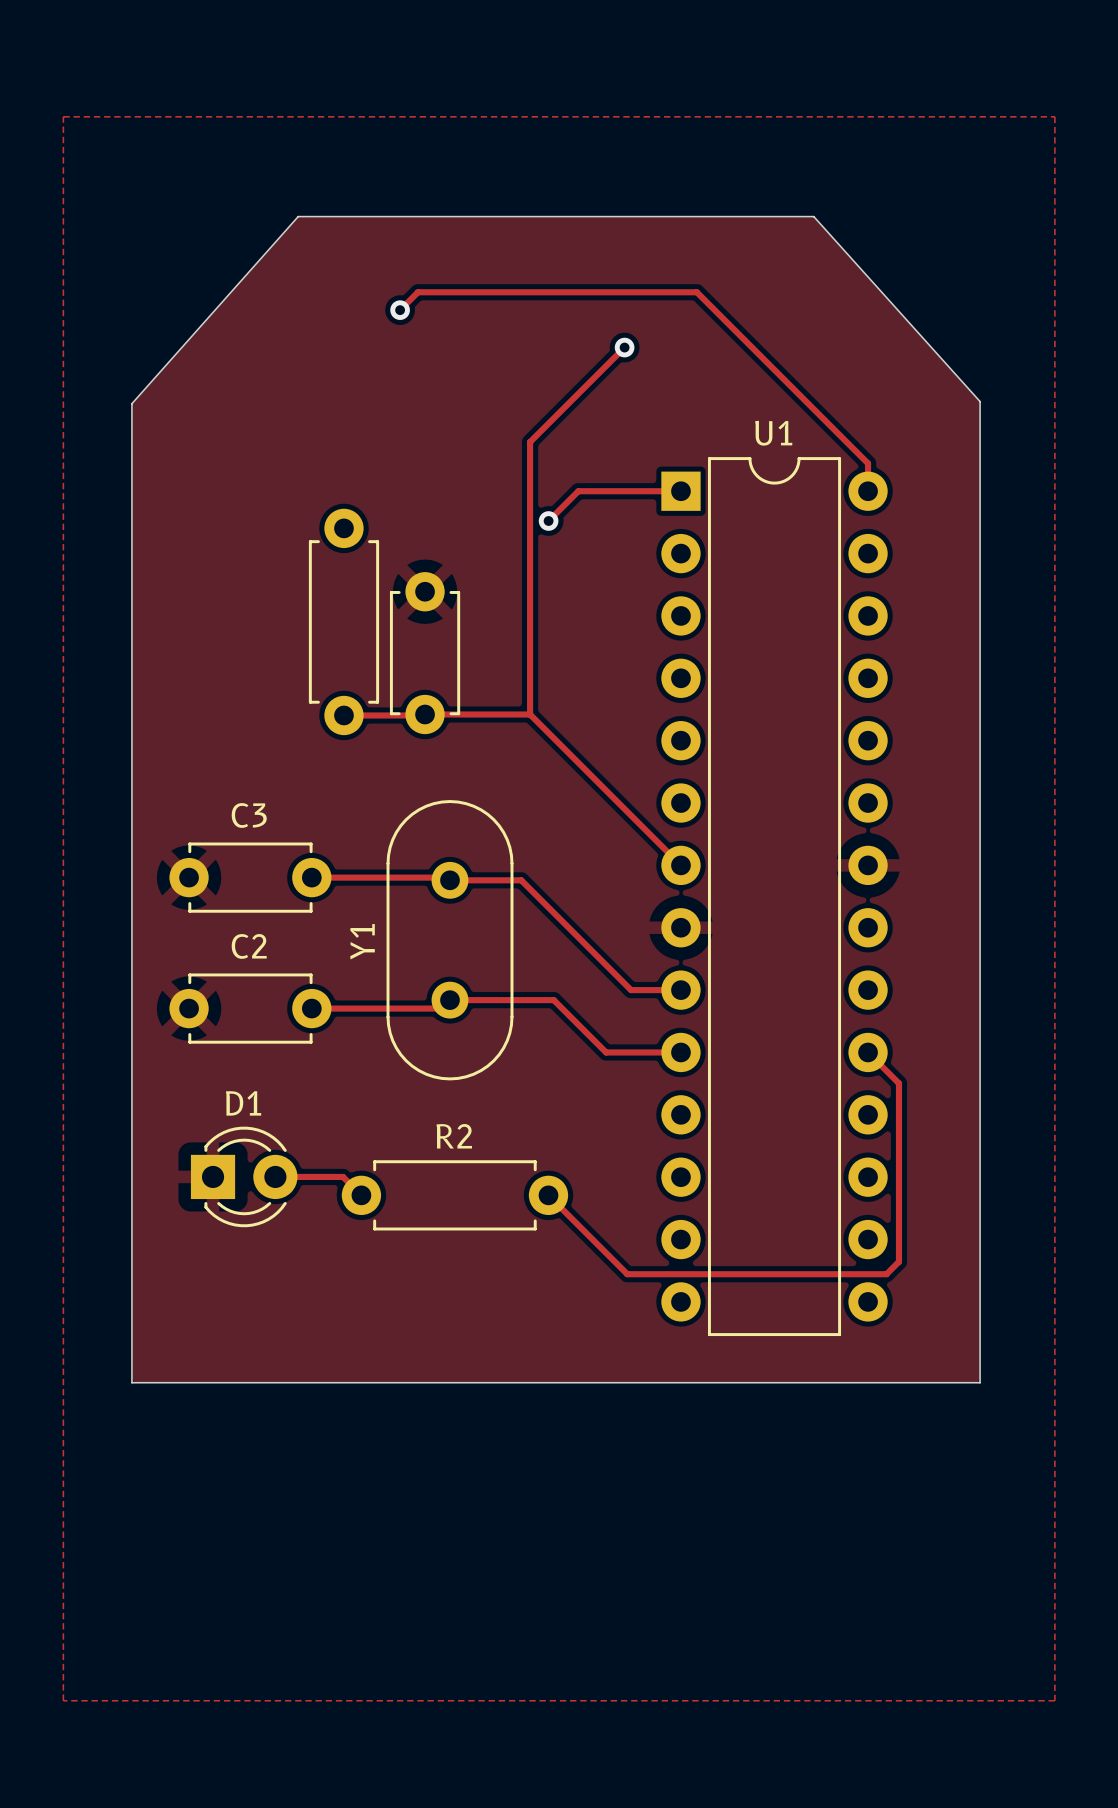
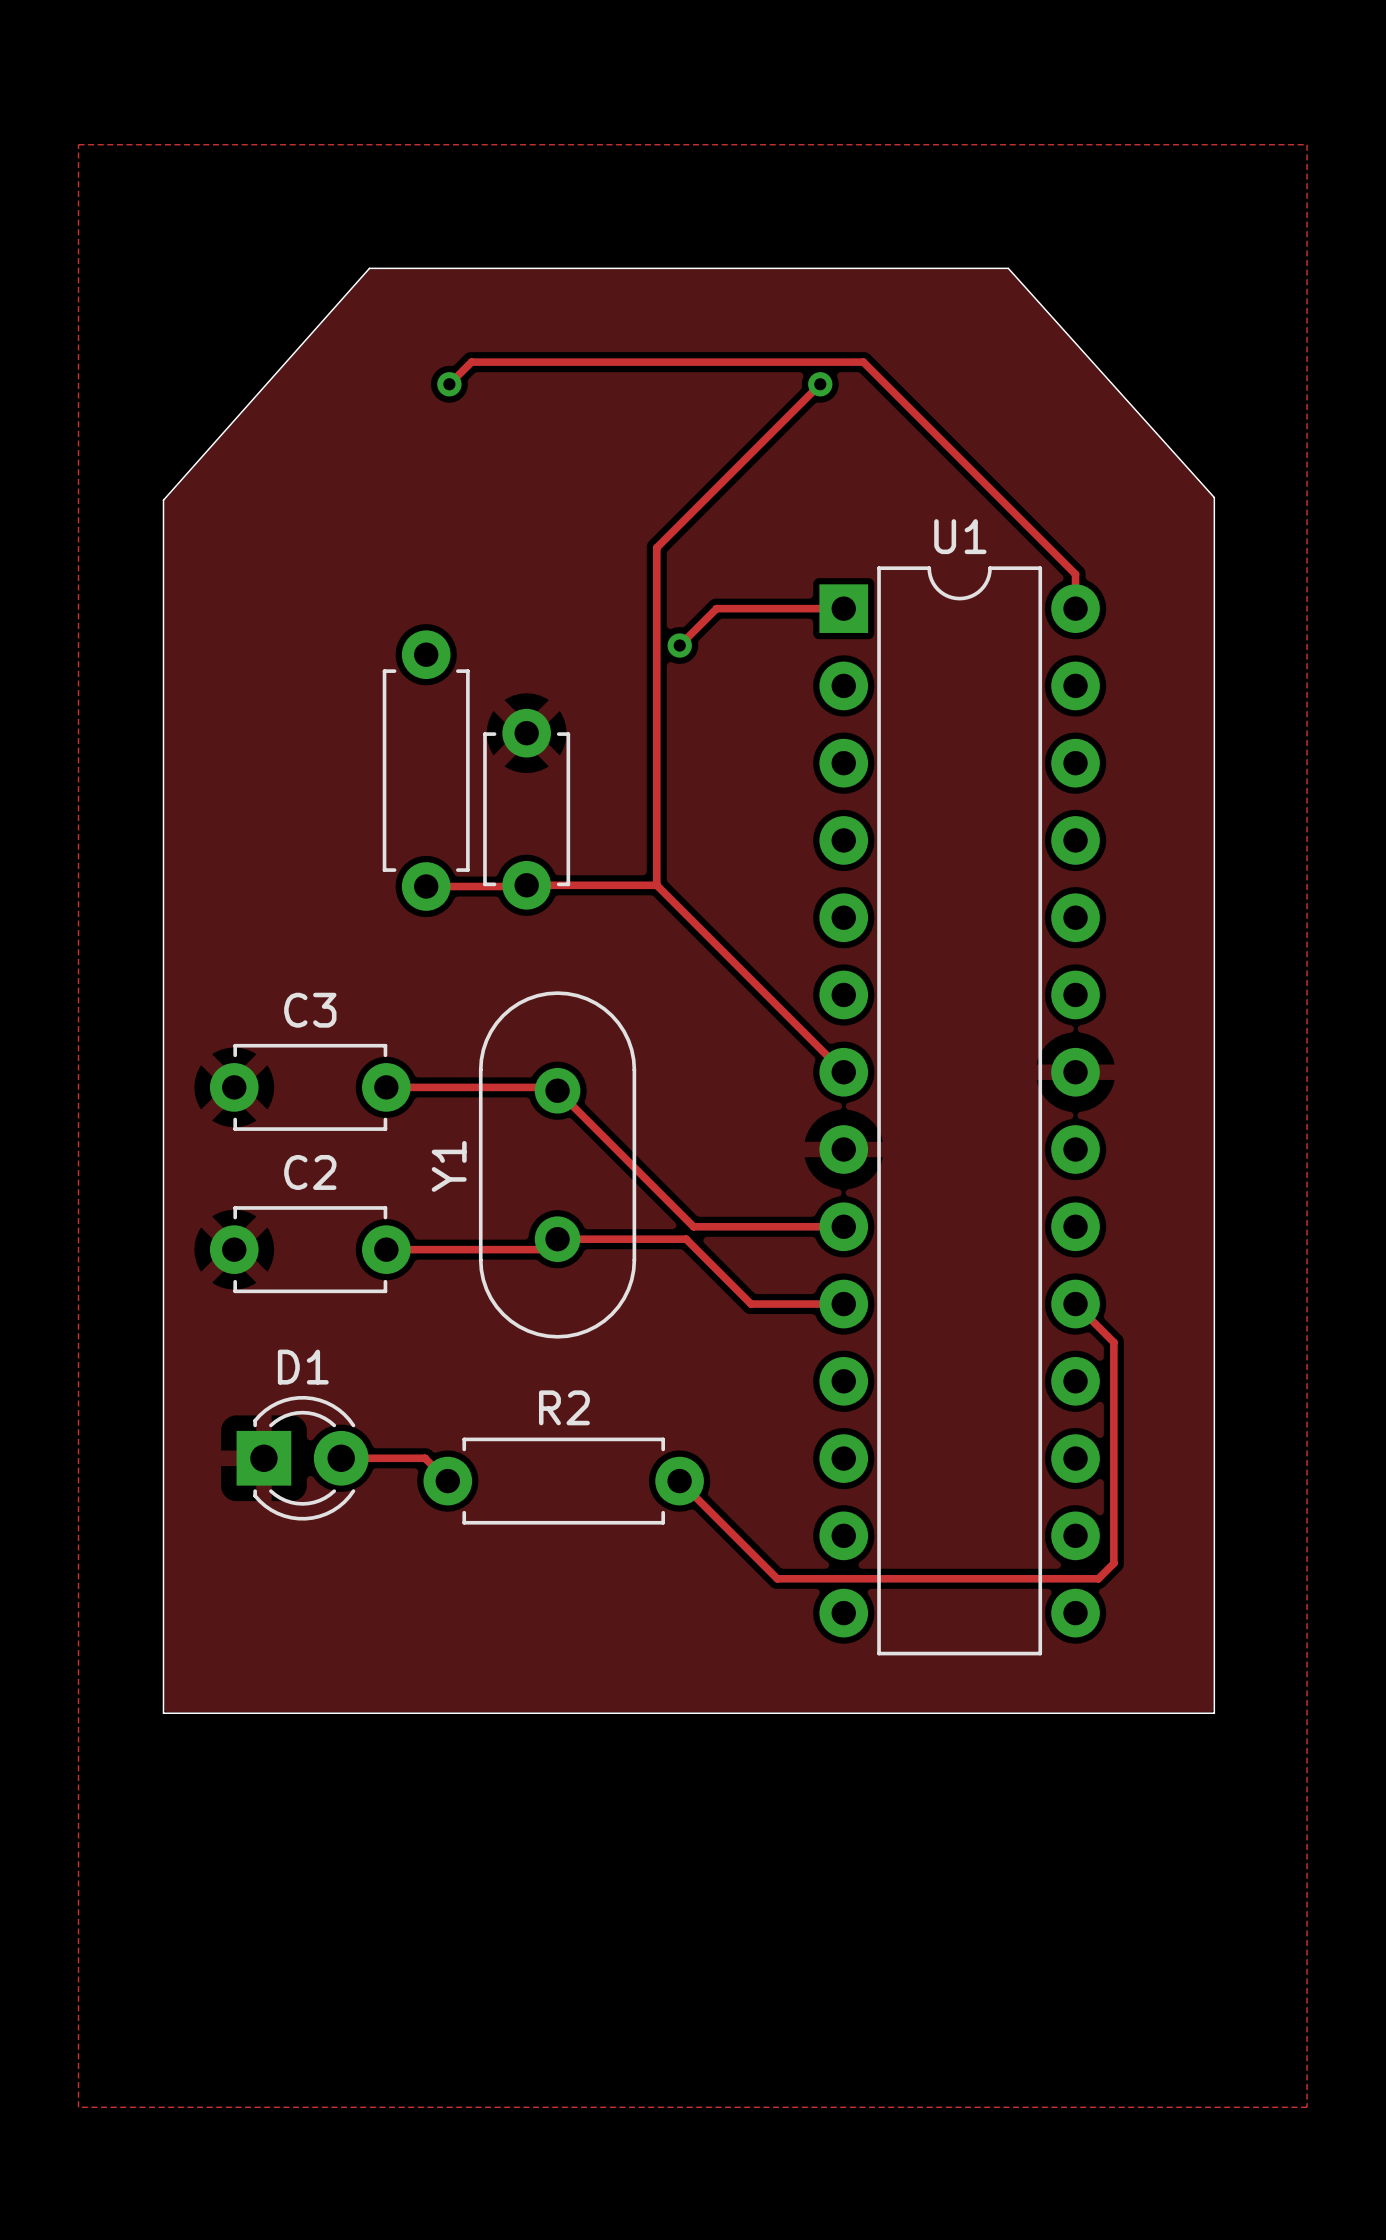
track: (417, 292) (400, 310) -> (517, 362) (471, 362) (449, 384)
via position: (400, 310) -> (449, 384)
track: none -> (820, 384) (773, 430)
via position: (624, 347) -> (820, 384)
track: (449, 880) (521, 880) (631, 990) -> (557, 1090) (693, 1226) (781, 1226)

